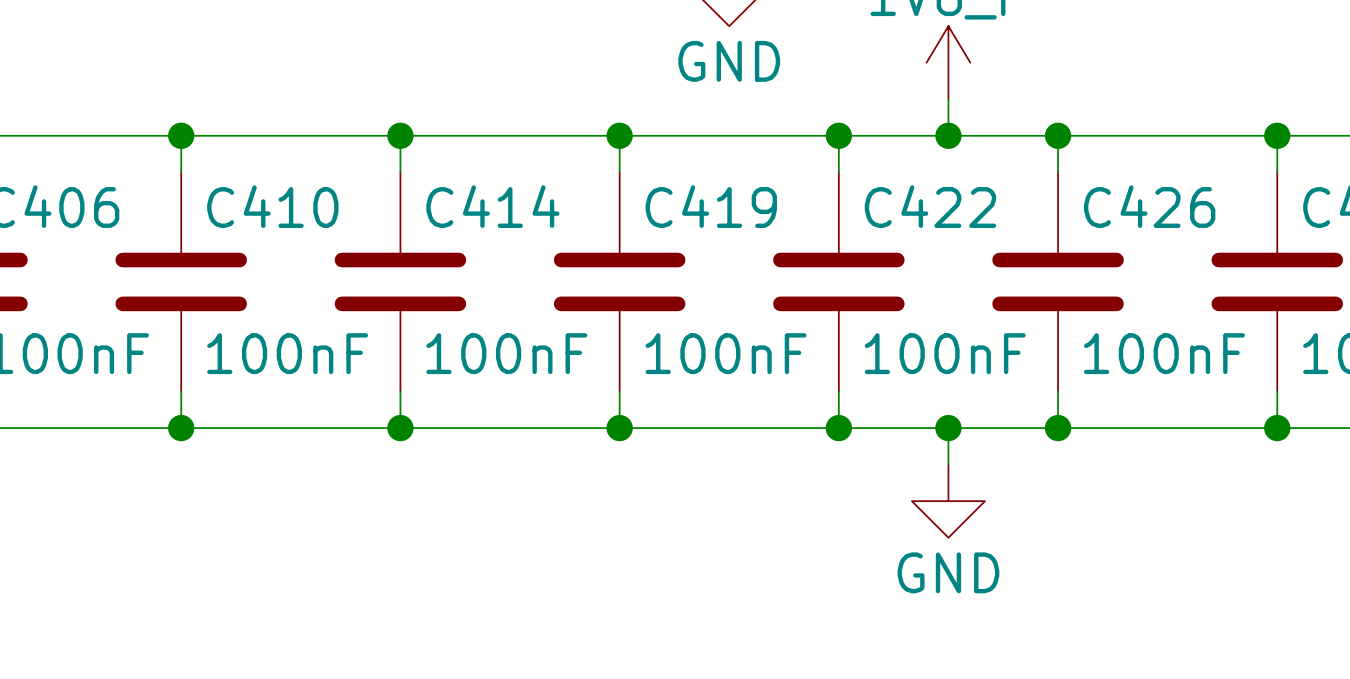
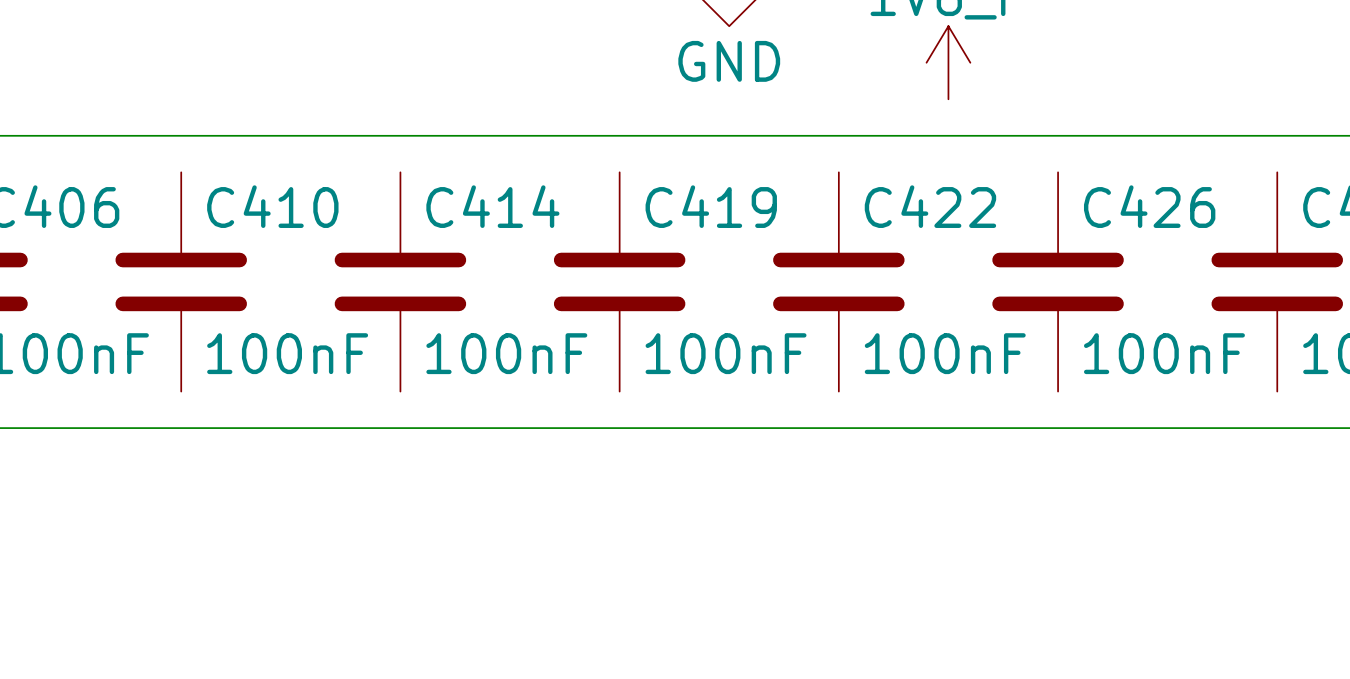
wire: (948, 99) (948, 135) -> none
wire: (181, 135) (181, 172) -> none
junction: (181, 135) -> none
wire: (400, 135) (400, 172) -> none
junction: (400, 135) -> none
wire: (619, 135) (619, 172) -> none
junction: (619, 135) -> none
wire: (838, 135) (838, 172) -> none
junction: (838, 135) -> none
junction: (948, 135) -> none
wire: (1058, 135) (1058, 172) -> none
junction: (1058, 135) -> none
wire: (1277, 135) (1277, 172) -> none
junction: (1277, 135) -> none
wire: (181, 391) (181, 428) -> none
wire: (400, 391) (400, 428) -> none
wire: (619, 391) (619, 428) -> none
wire: (838, 391) (838, 428) -> none
wire: (1058, 391) (1058, 428) -> none
wire: (1277, 391) (1277, 428) -> none
junction: (181, 428) -> none
junction: (400, 428) -> none
junction: (619, 428) -> none
junction: (838, 428) -> none
wire: (948, 428) (948, 464) -> none
junction: (948, 428) -> none
junction: (1058, 428) -> none
junction: (1277, 428) -> none
power symbol: GND (948, 501) -> none

